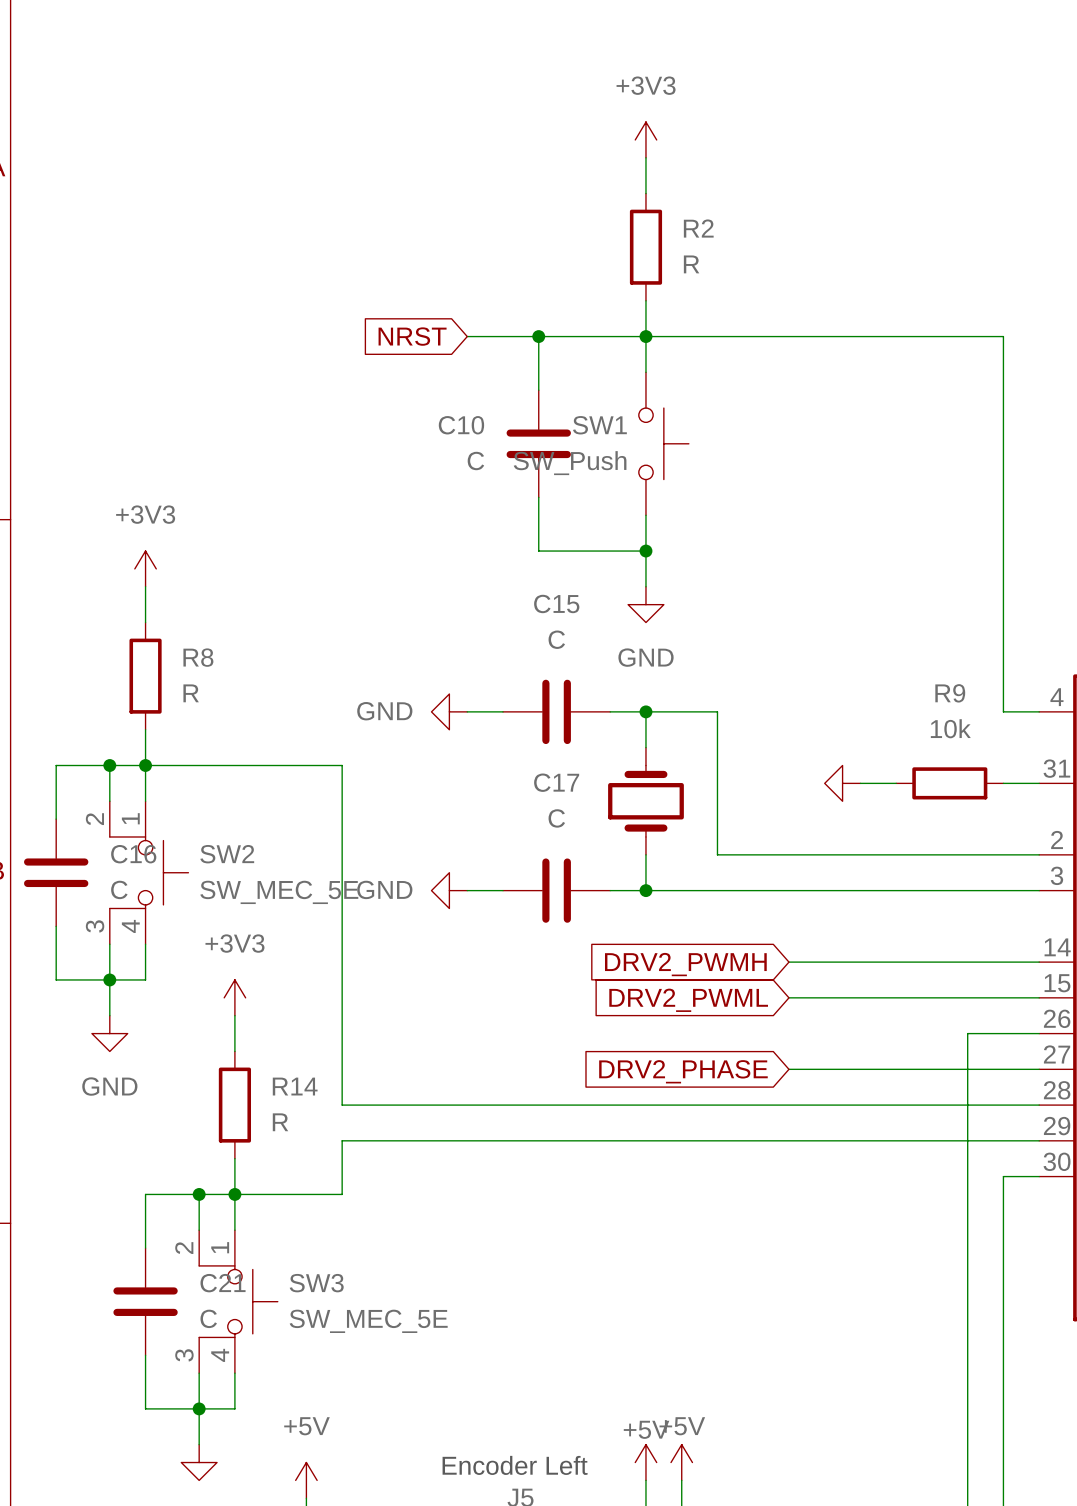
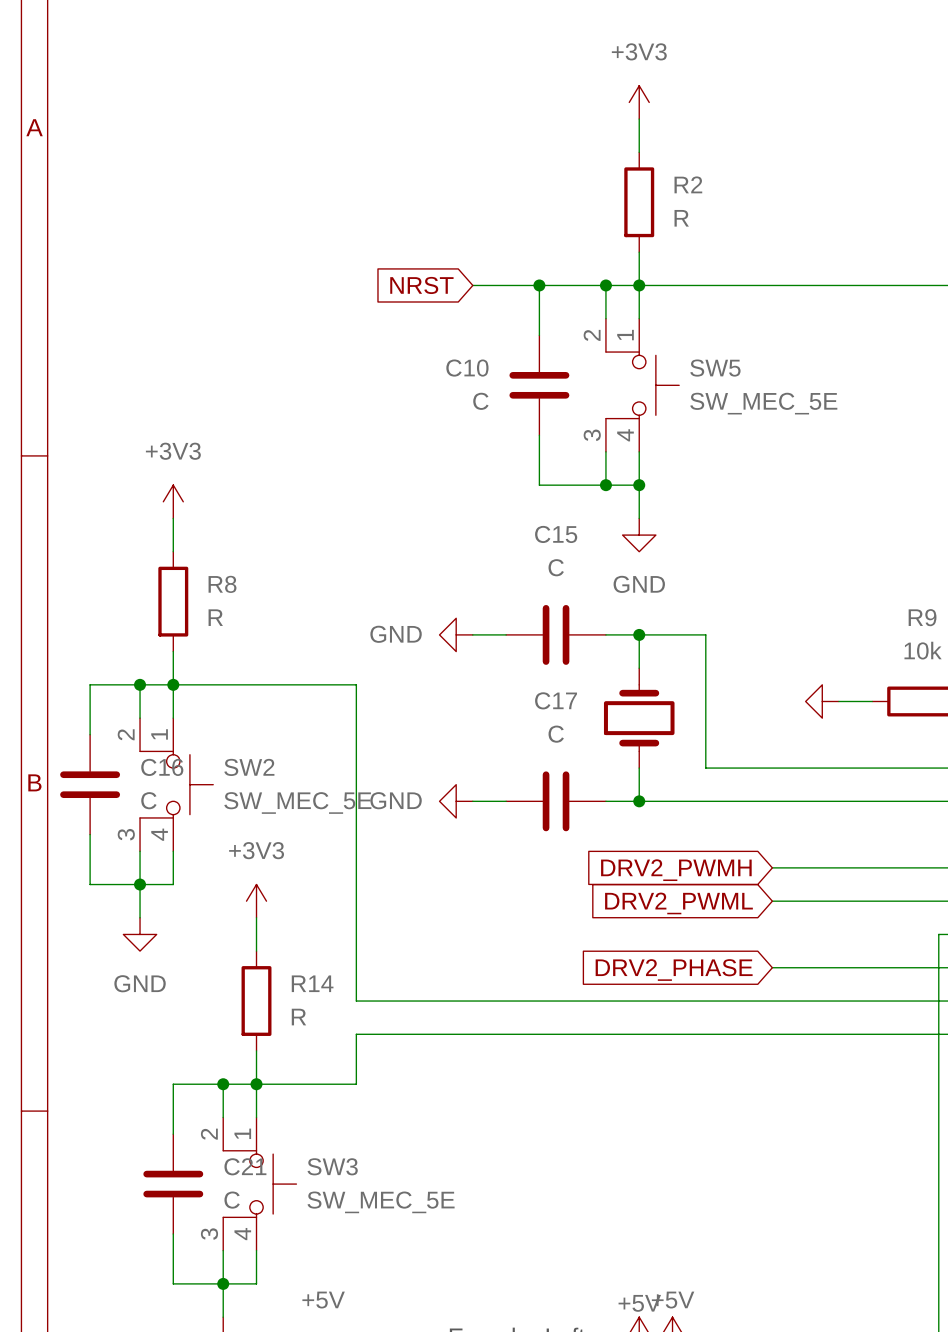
wire: none -> (605, 285) (605, 318)
junction: none -> (605, 285)
SW5: none -> SW_MEC_5E (642, 385)
SW1: SW_Push (663, 443) -> none
wire: none -> (605, 451) (605, 485)
junction: none -> (605, 485)

